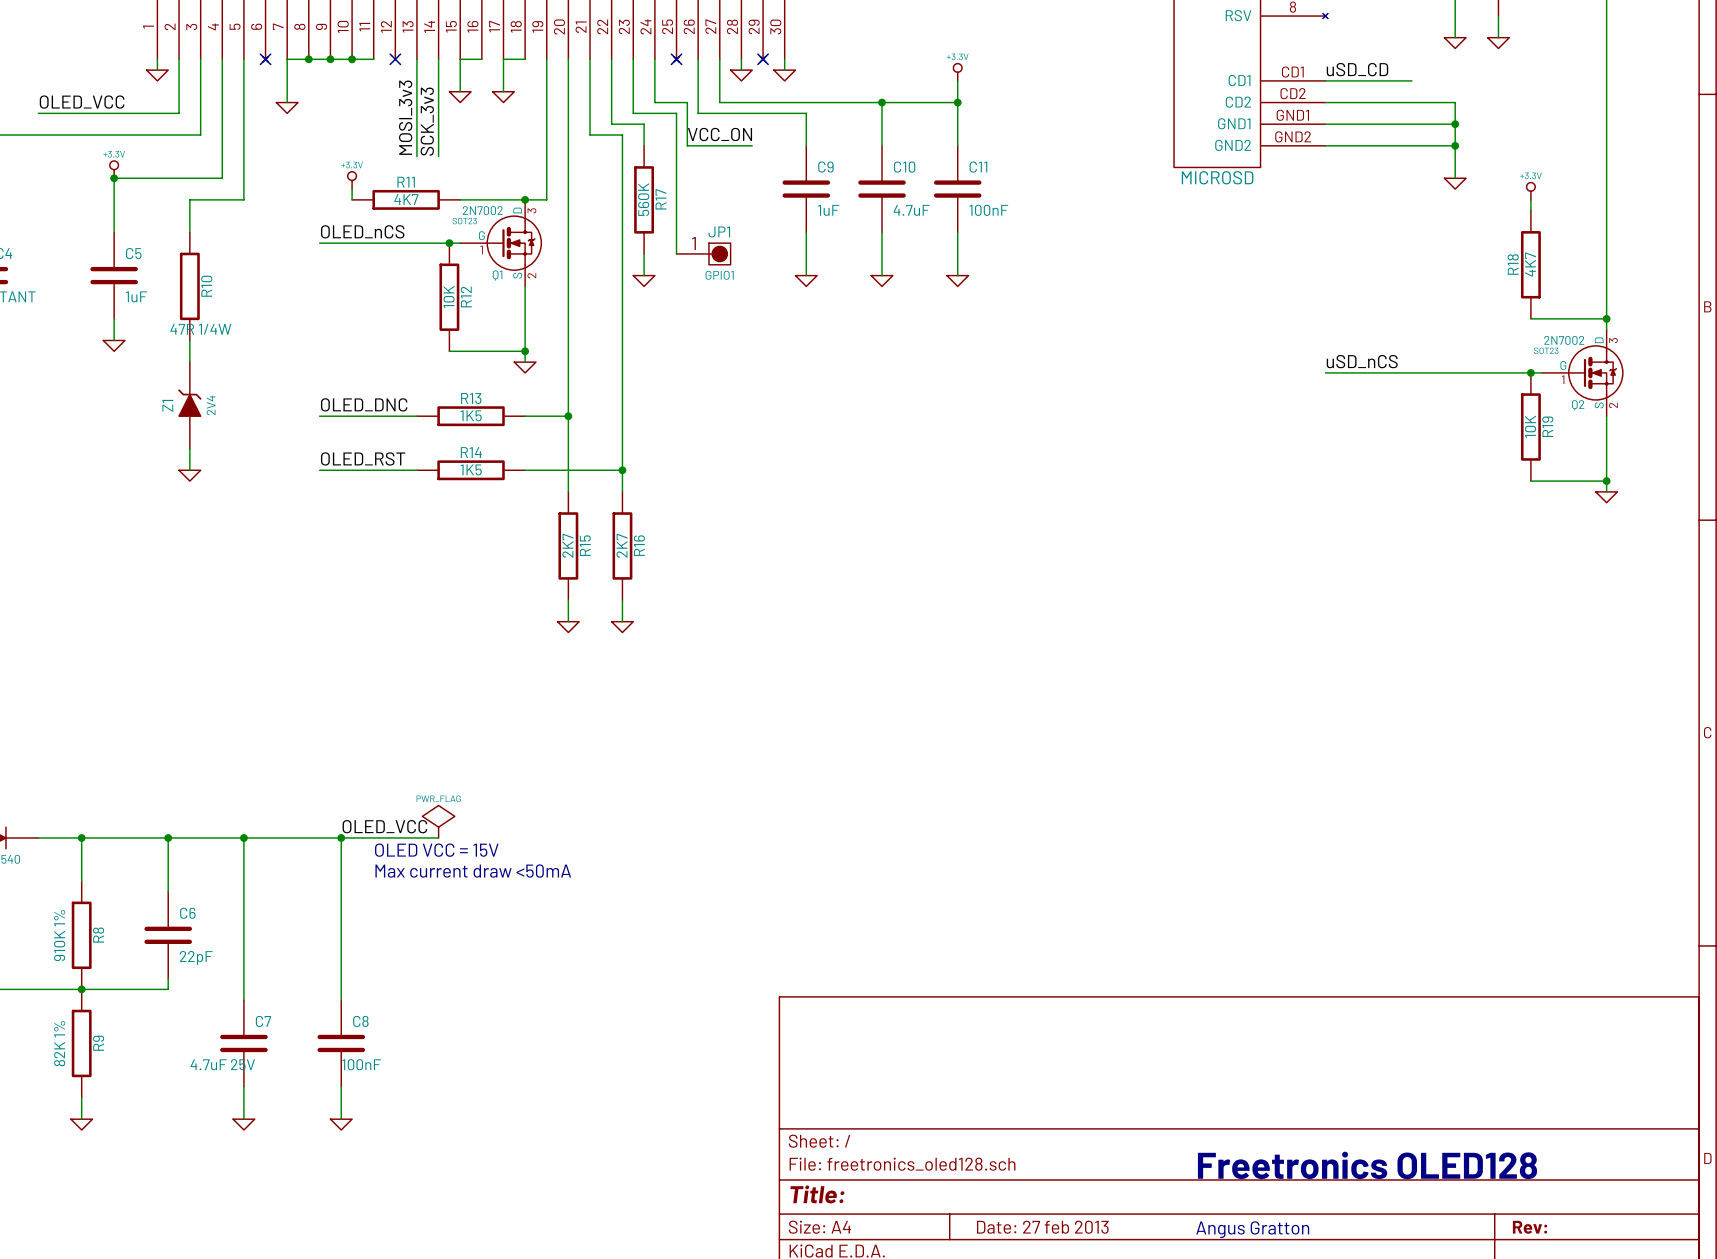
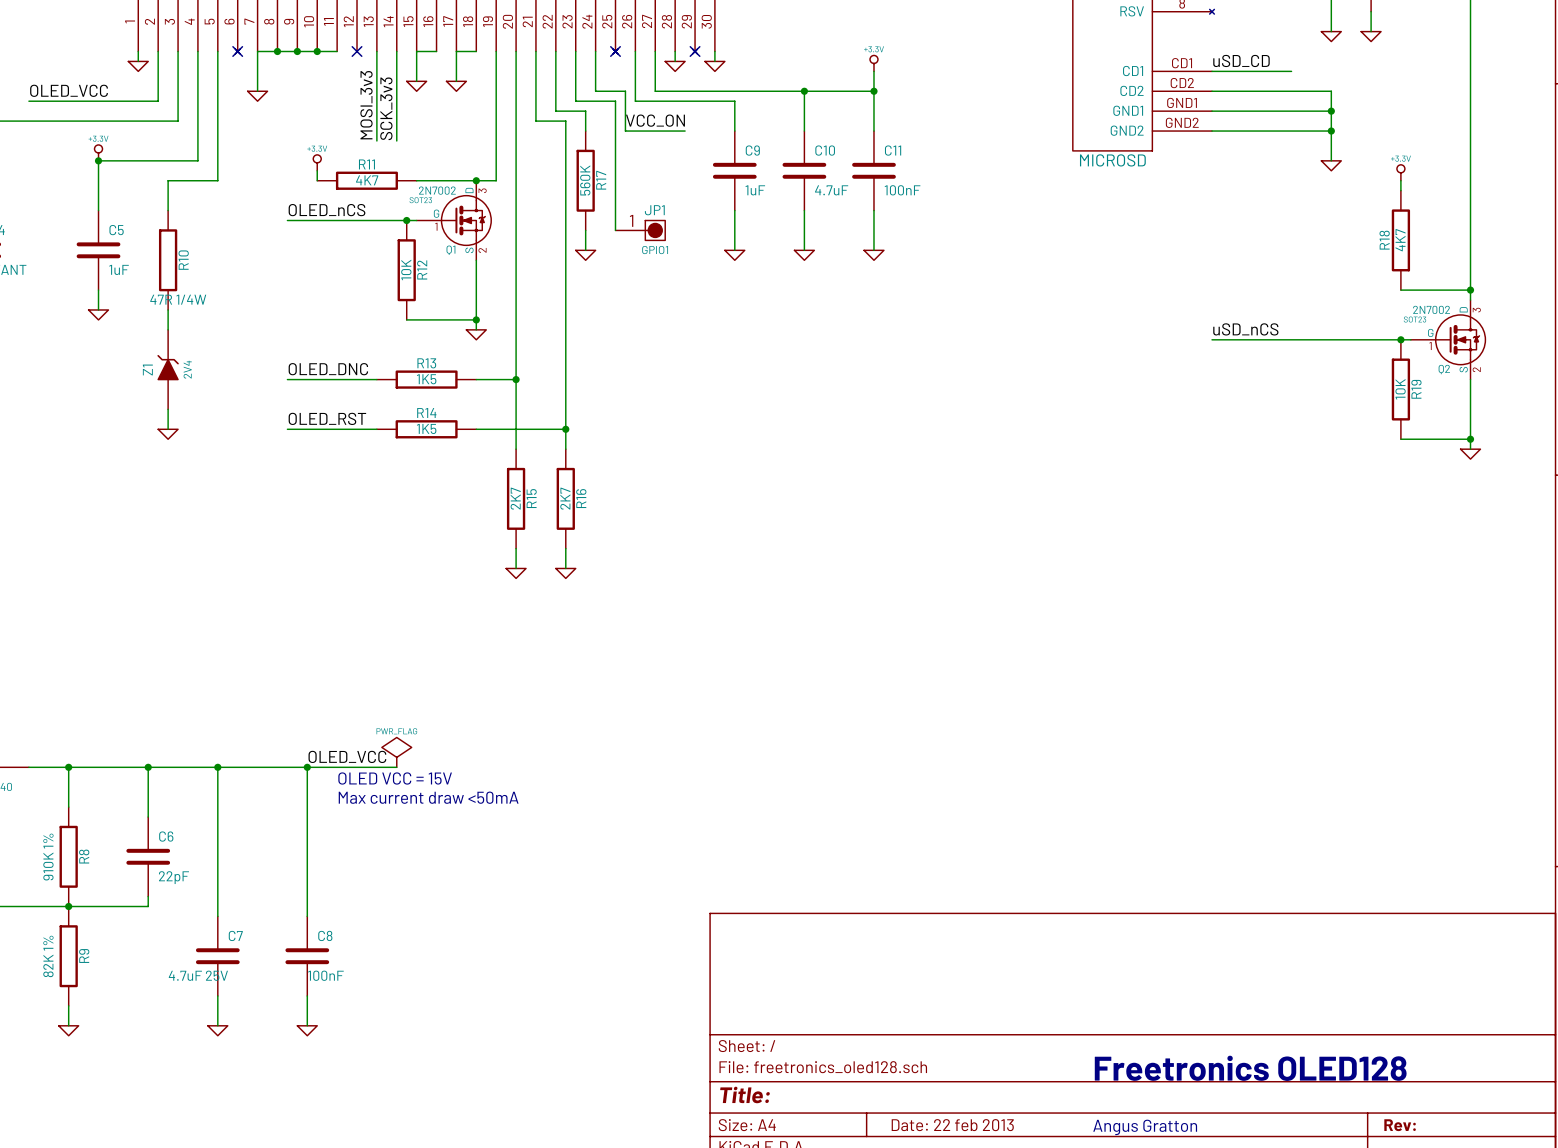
title block: Date: 27 feb 2013 (1042, 1227) -> Date: 22 feb 2013 (952, 1125)

